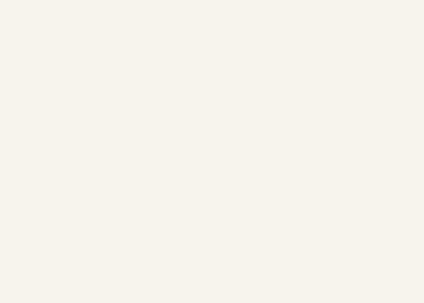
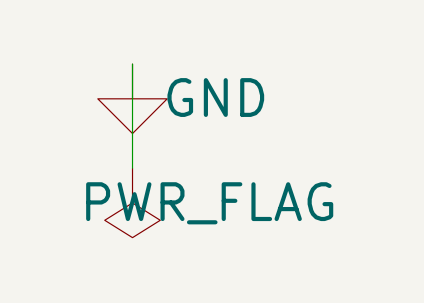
wire: none -> (132, 64) (132, 168)
power symbol: none -> GND (132, 98)
power symbol: none -> PWR_FLAG (132, 202)

